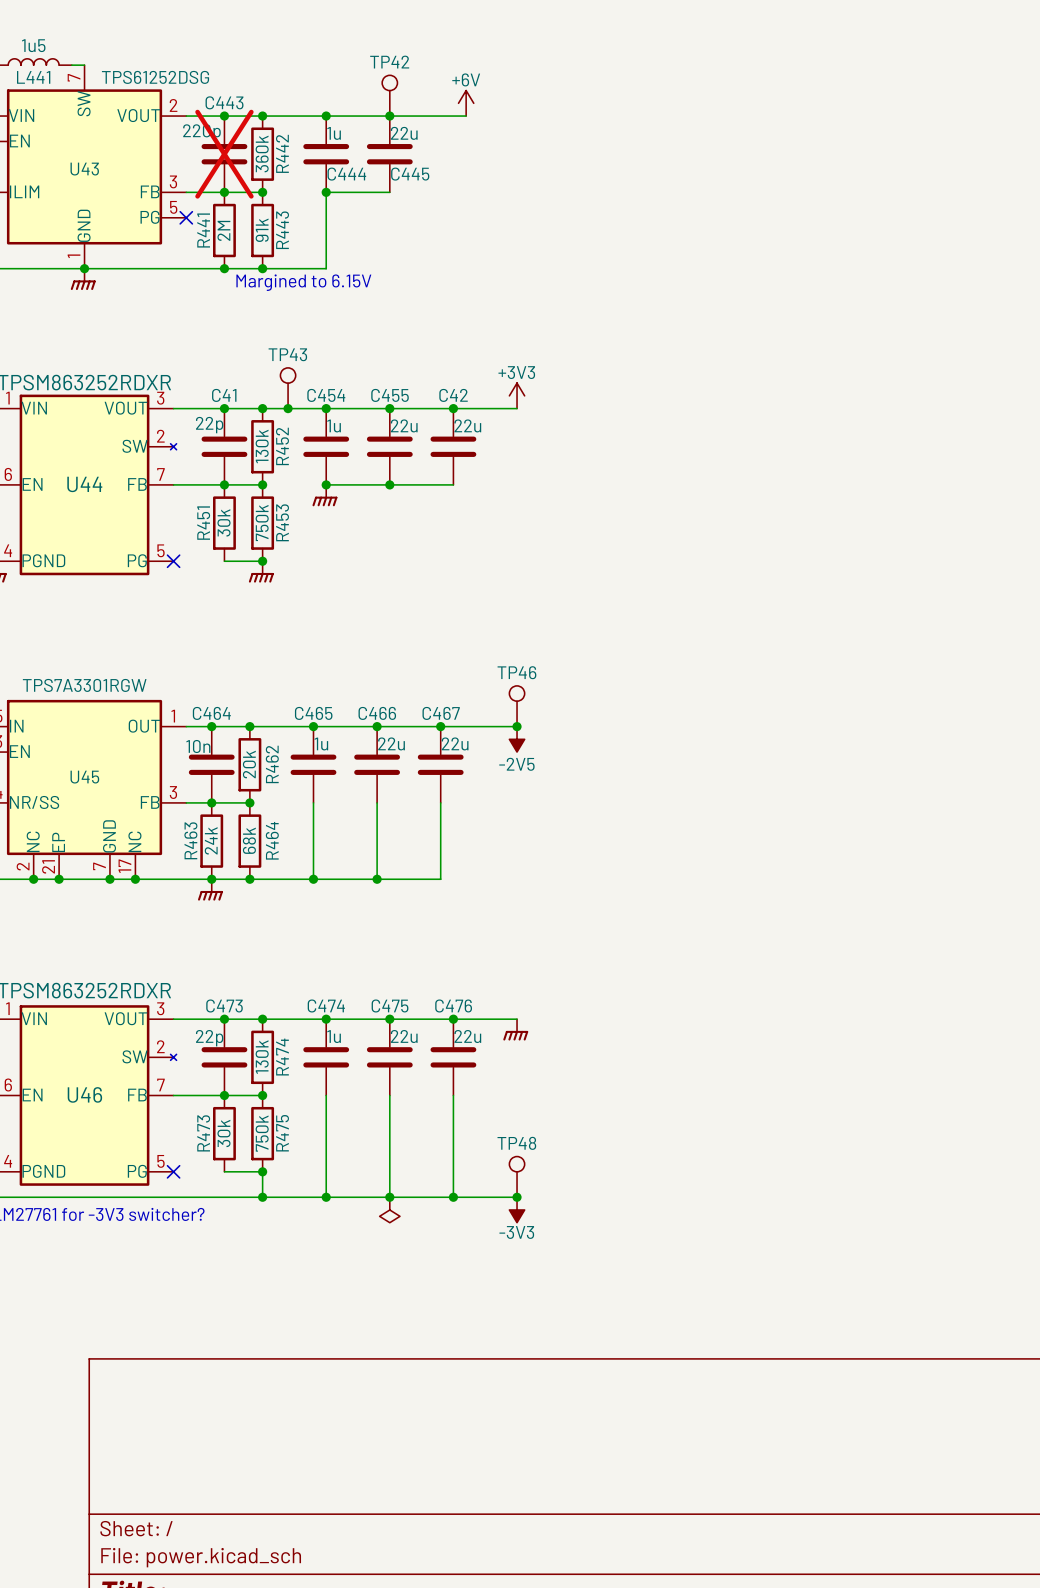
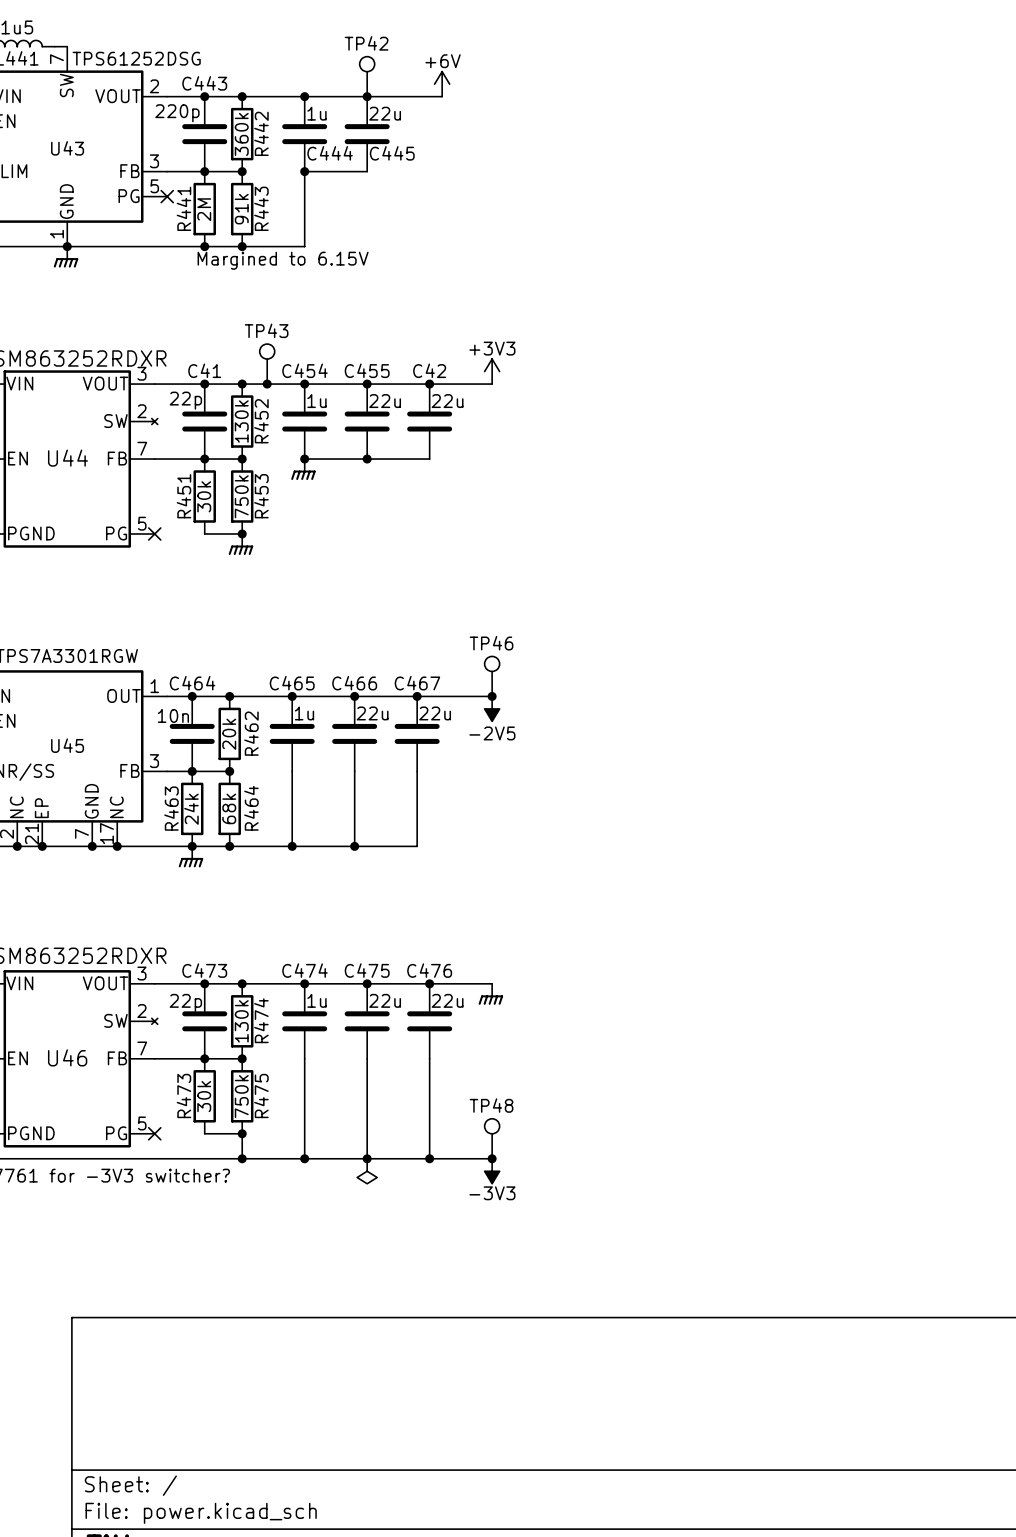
C443 do-not-place cross: (224, 154) -> none

